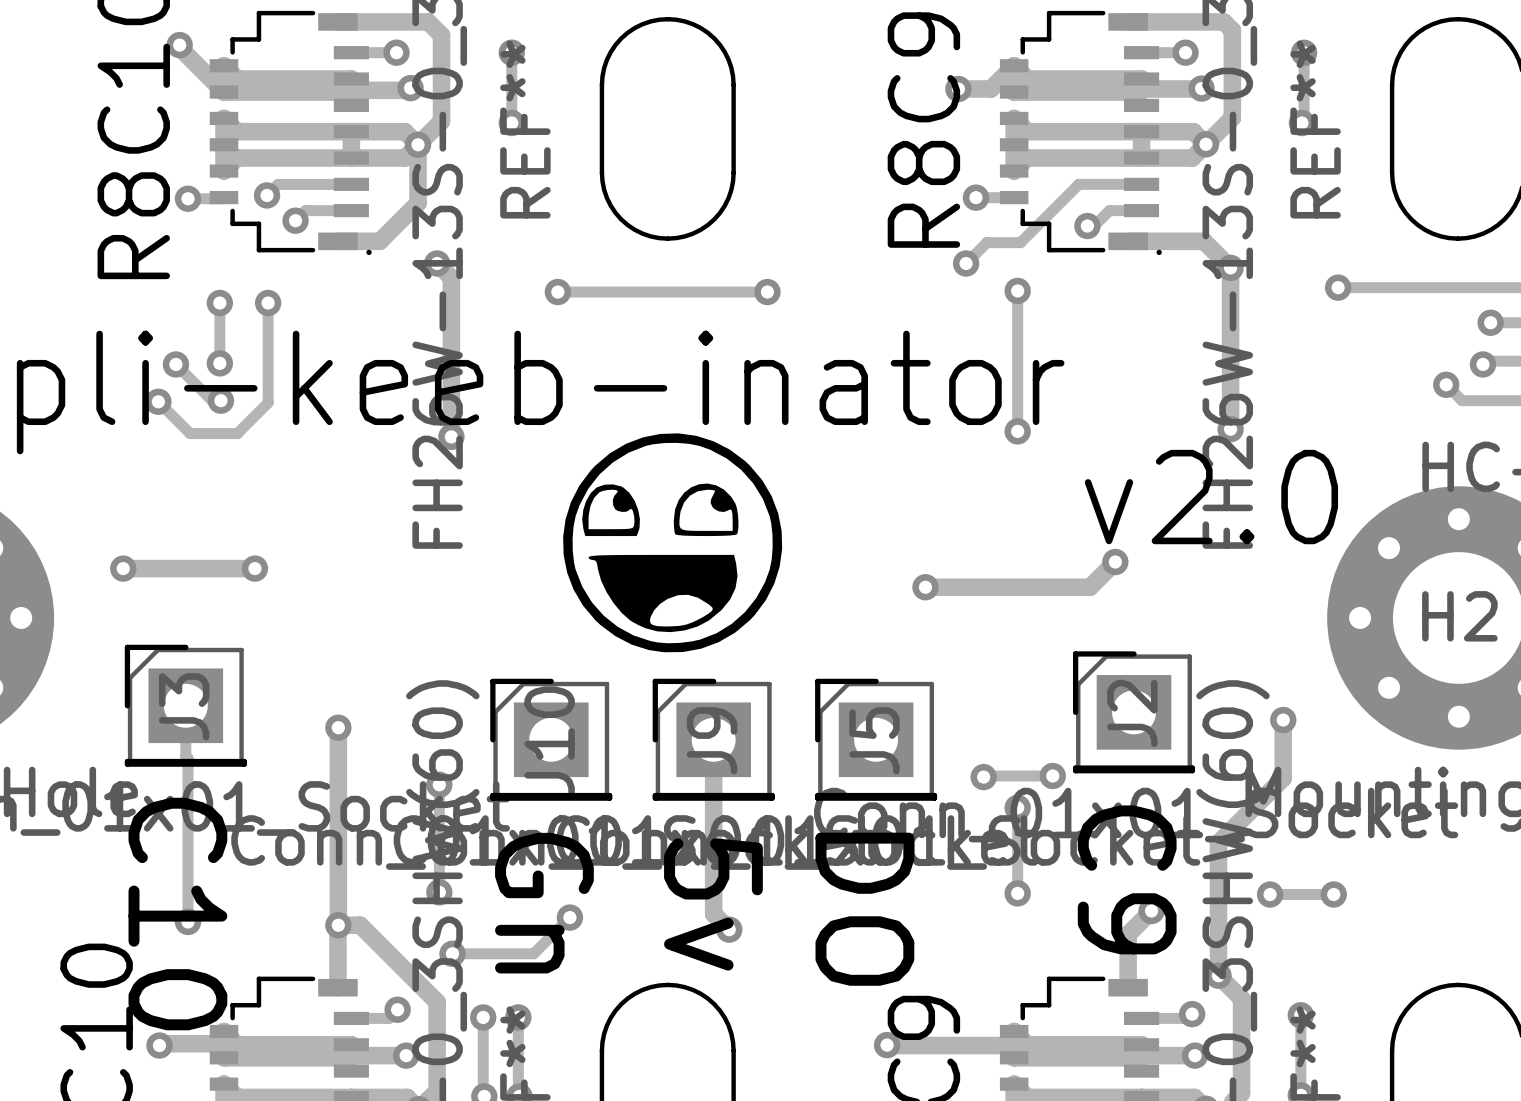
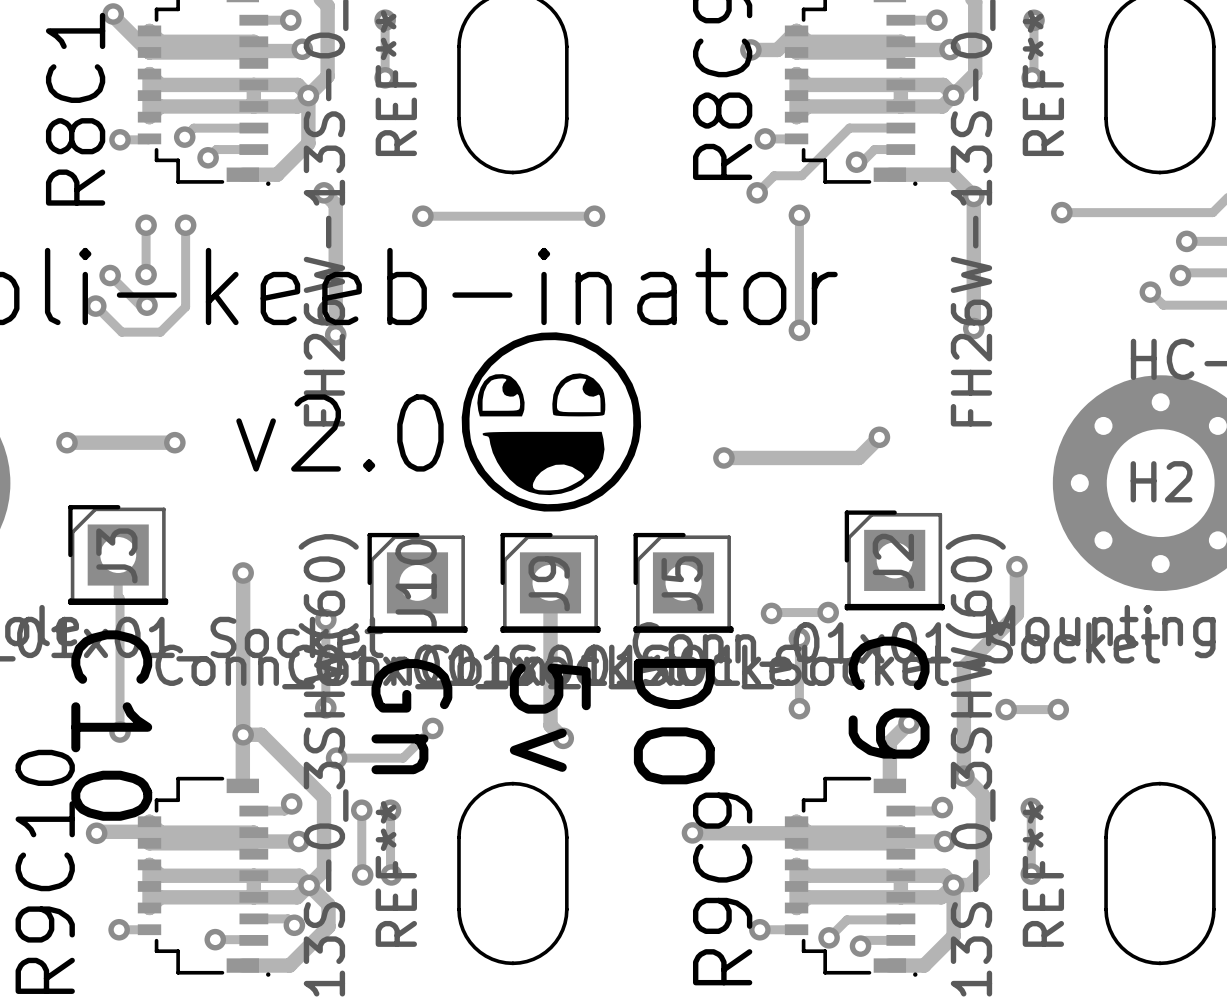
text position: v2.0 (1211, 497) -> v2.0 (339, 432)
drawing position: (672, 542) -> (551, 421)

